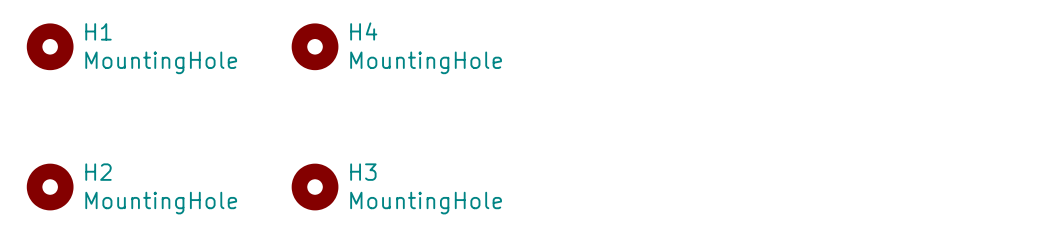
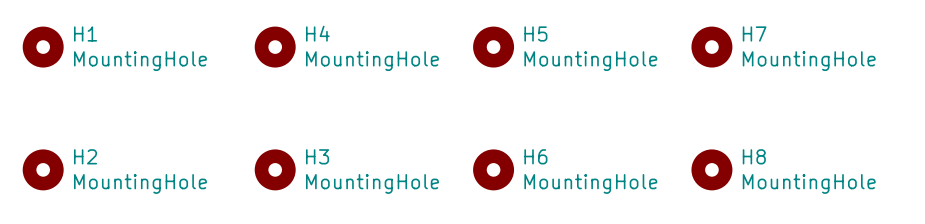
H5: none -> MountingHole (493, 47)
H7: none -> MountingHole (711, 47)
H6: none -> MountingHole (493, 169)
H8: none -> MountingHole (711, 169)

